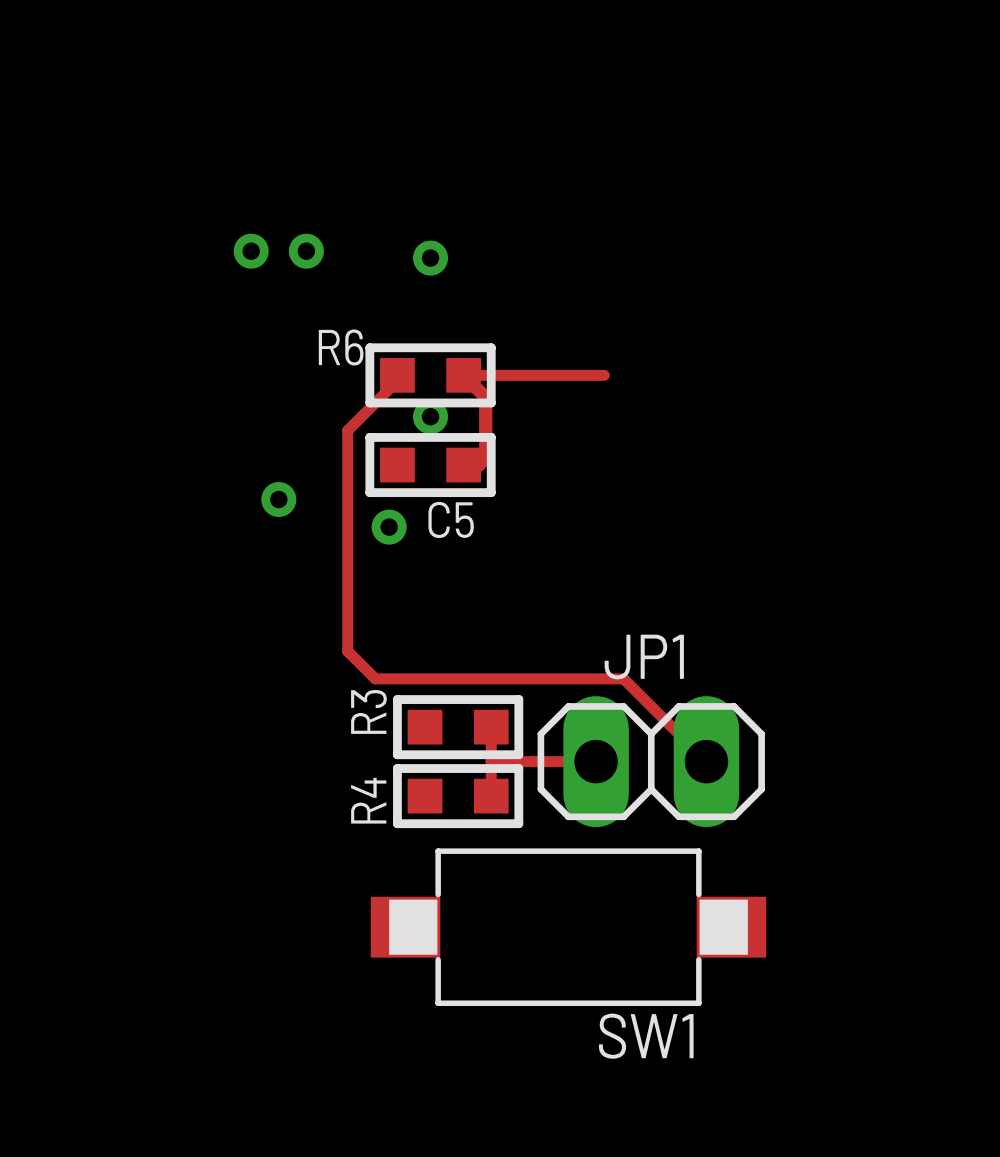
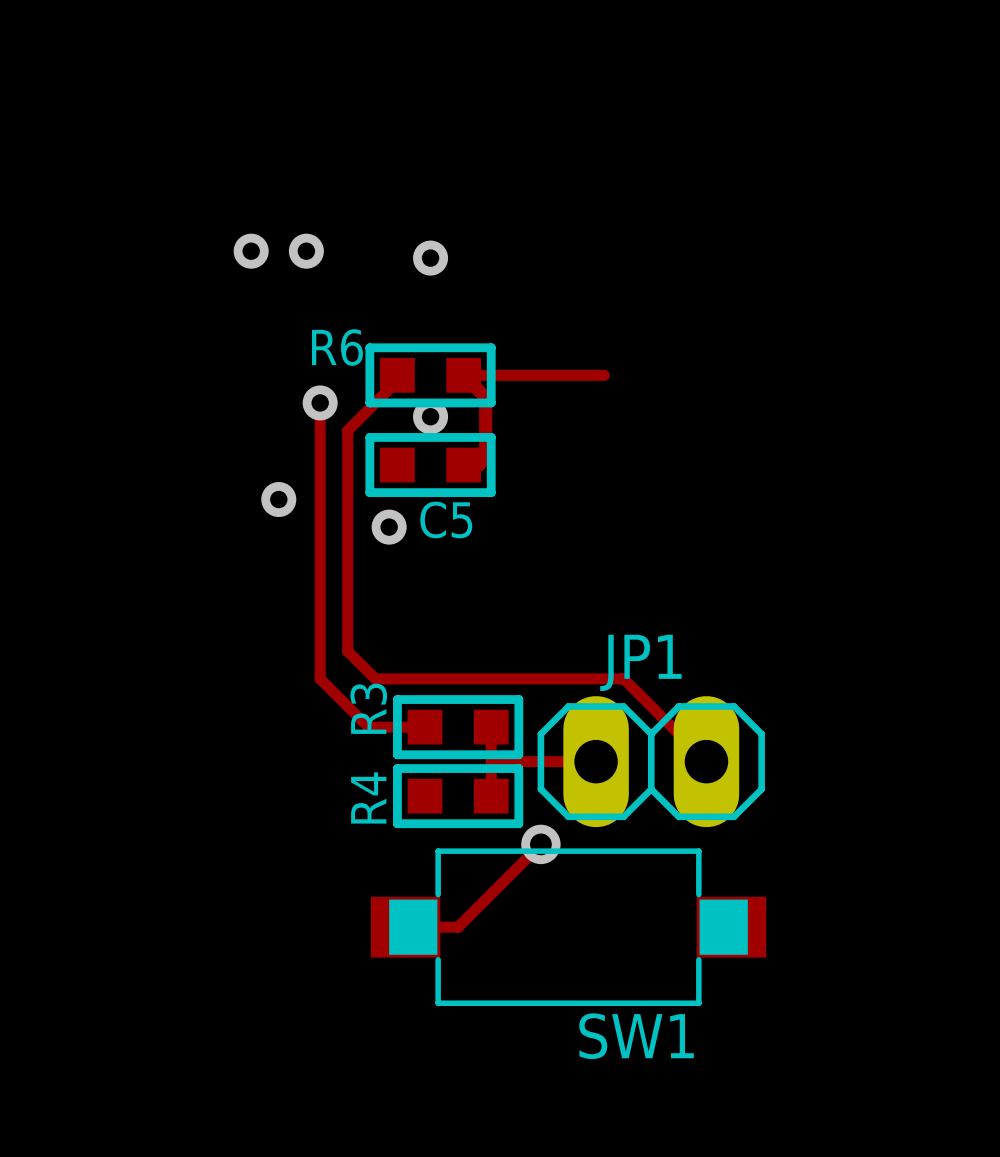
track: none -> (320, 402) (320, 678) (368, 727) (425, 727)
via: none -> (320, 402)
track: none -> (540, 844) (458, 927) (405, 927)
via: none -> (540, 844)

